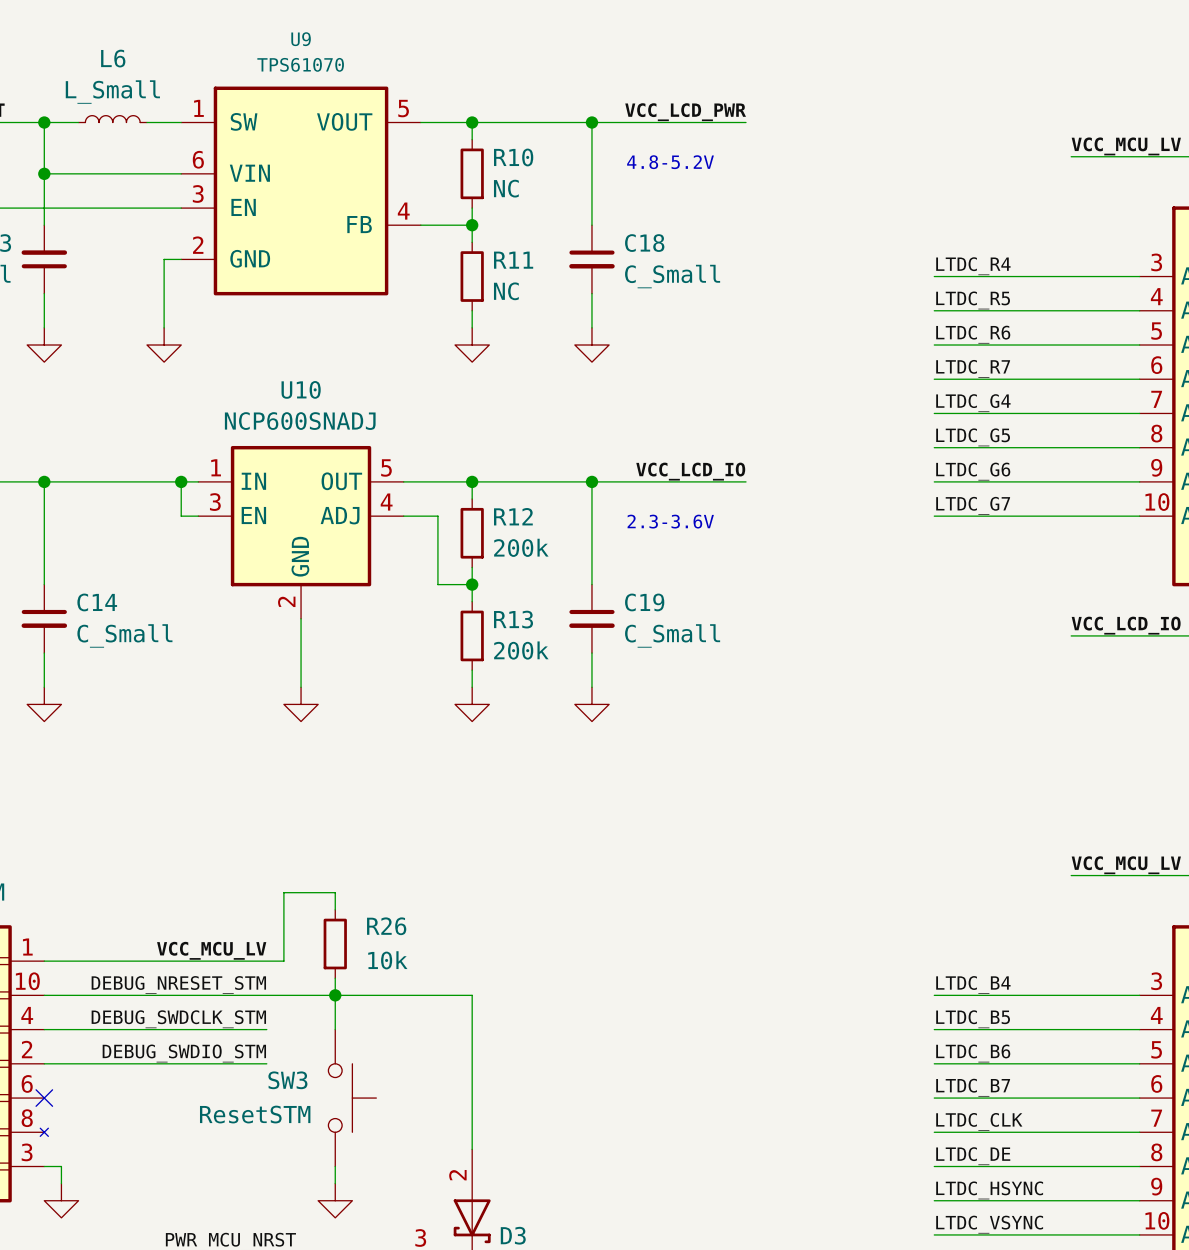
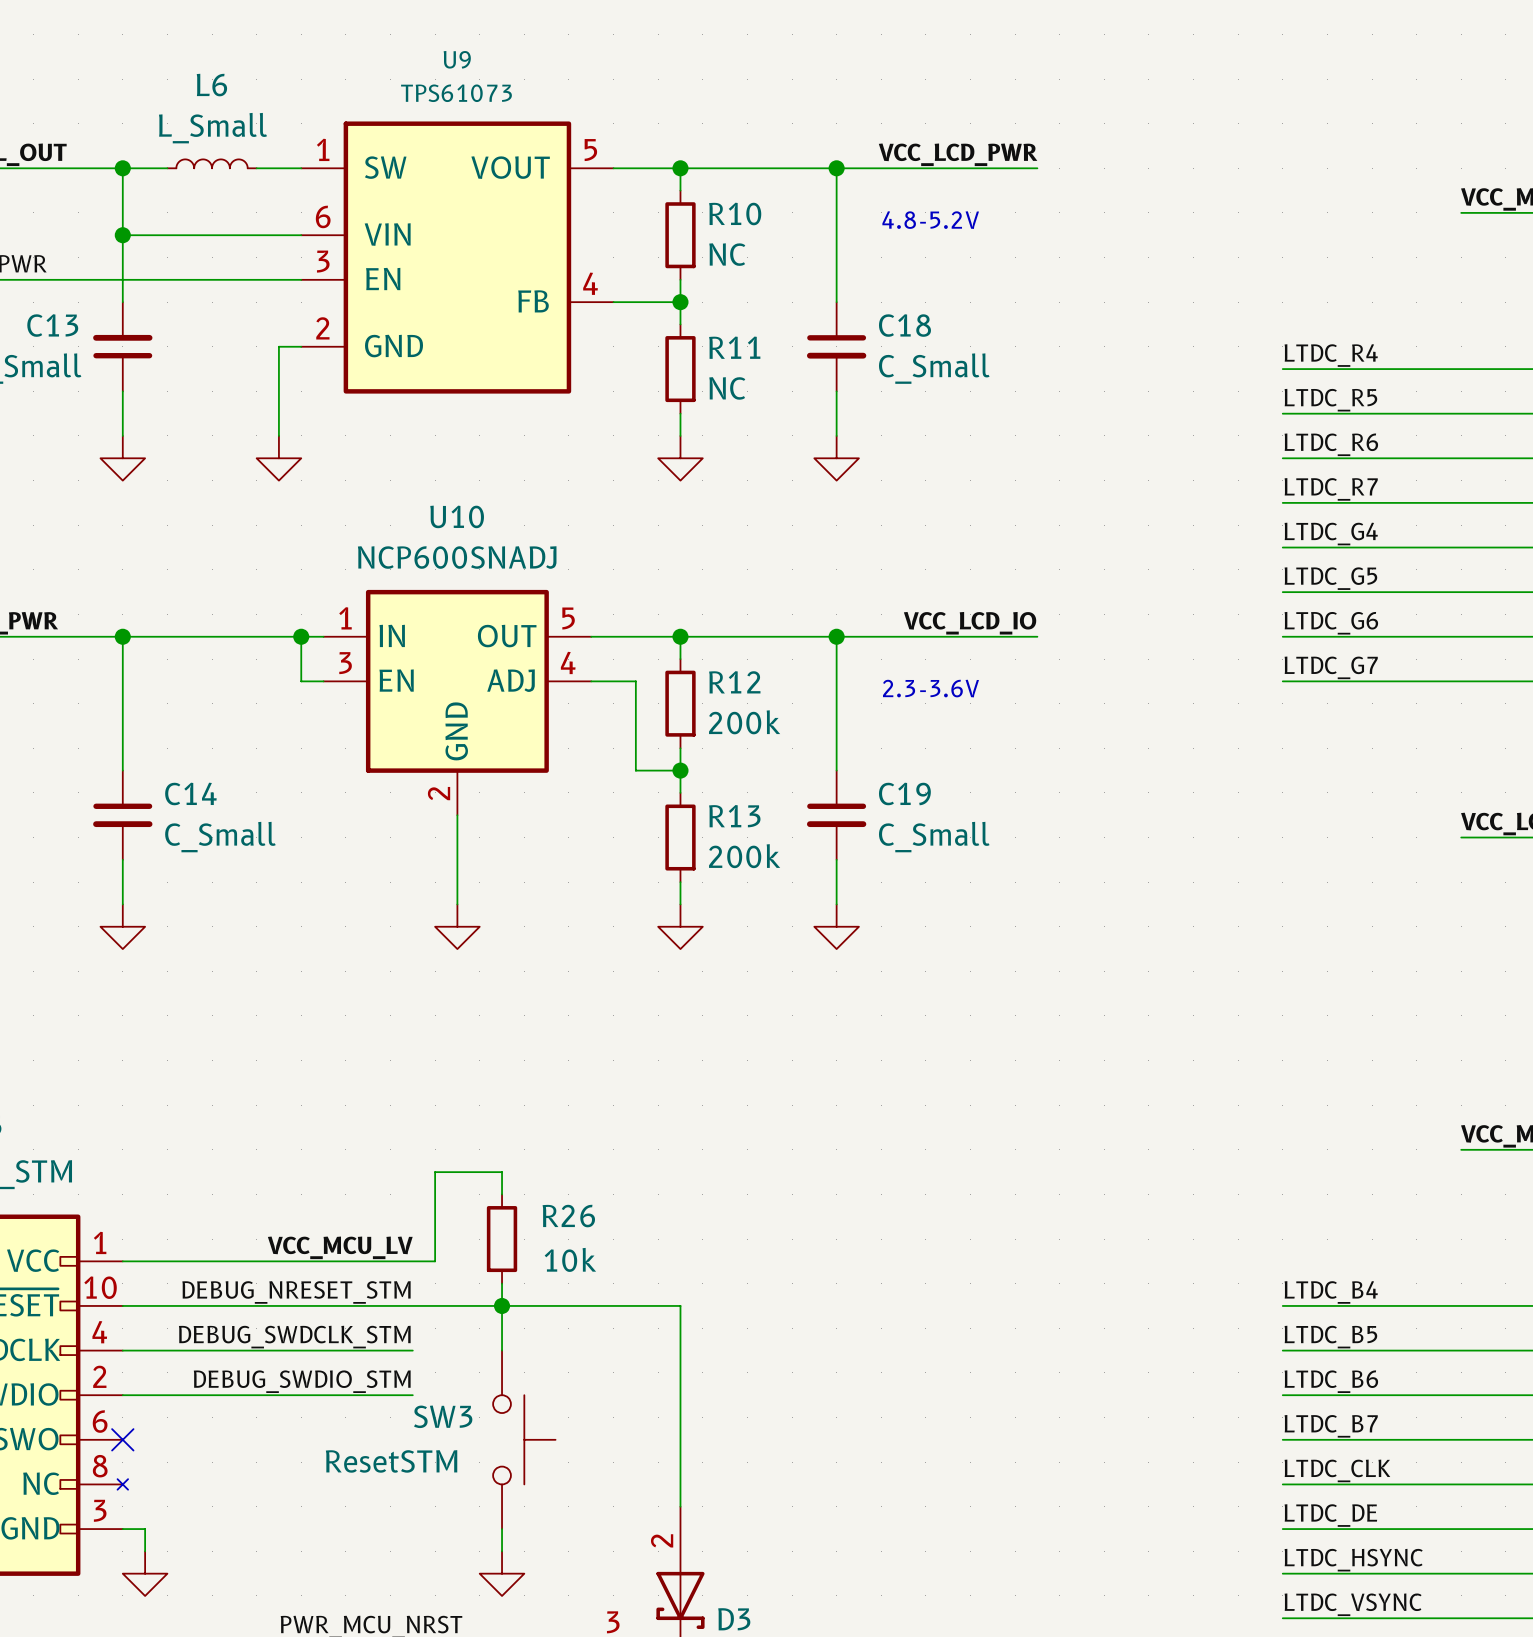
U9 value: TPS61070 (300, 64) -> TPS61073 (456, 93)

